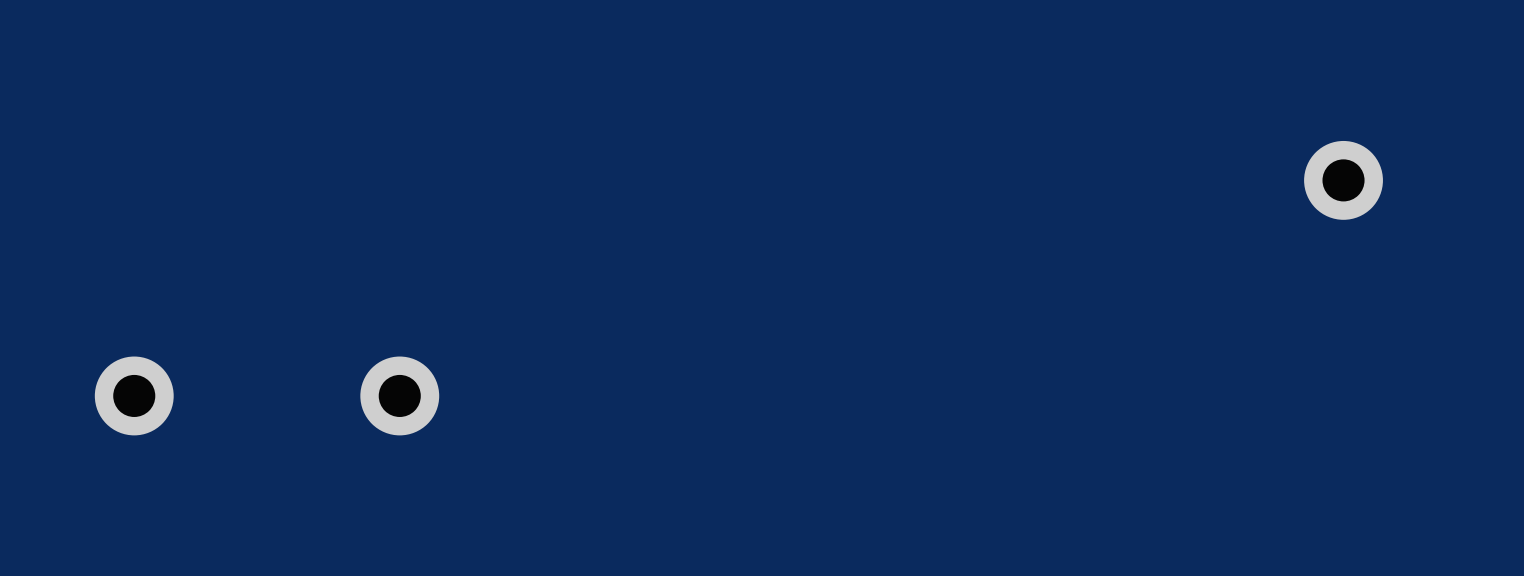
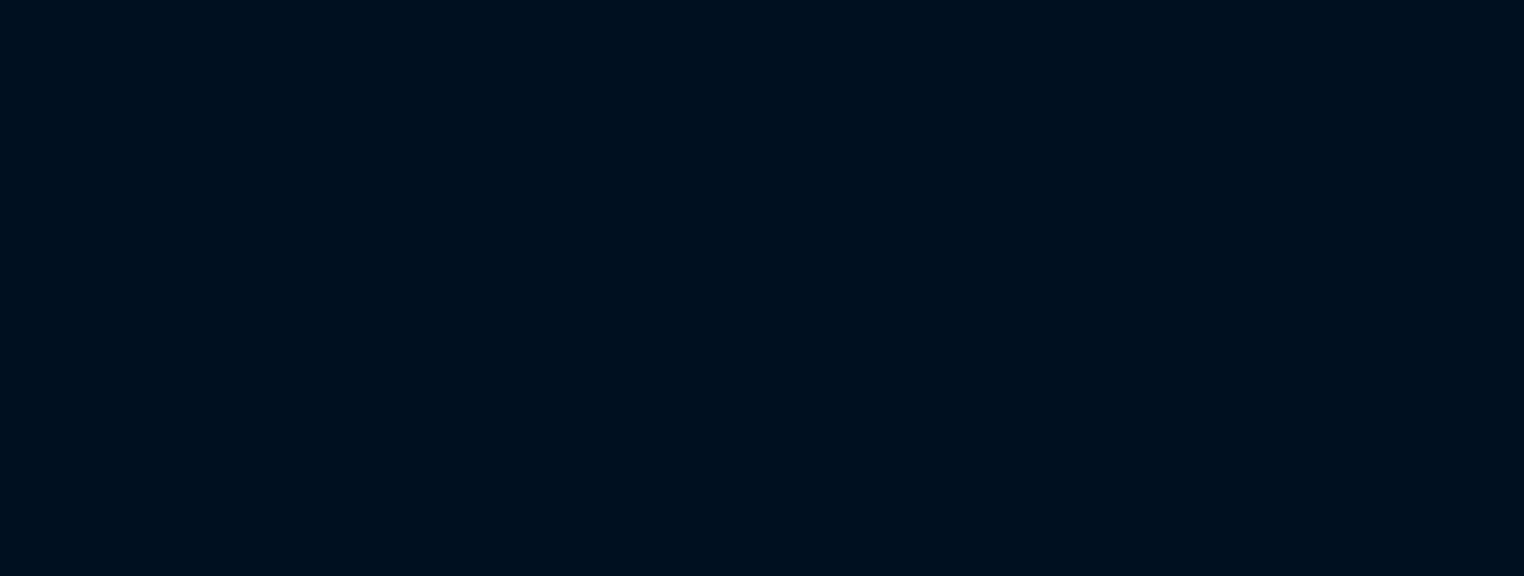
part: (1343, 180) -> none
part: (134, 395) -> none
part: (399, 395) -> none

